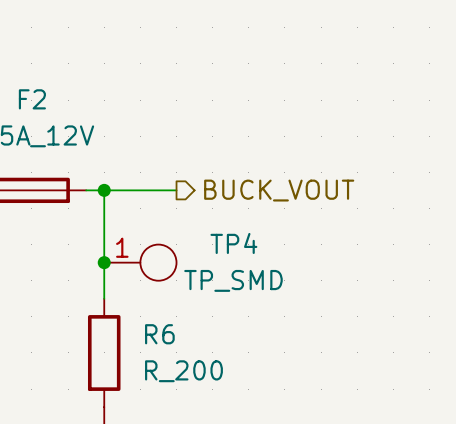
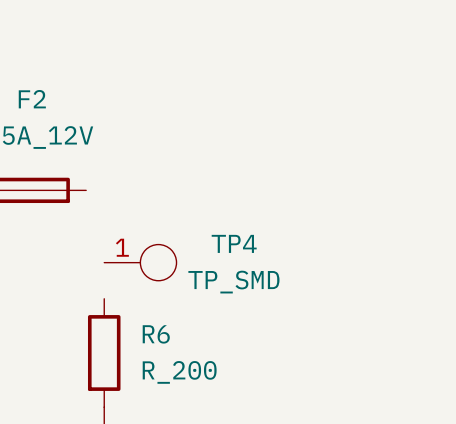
wire: (86, 190) (176, 190) -> none
wire: (104, 190) (104, 298) -> none
junction: (104, 190) -> none
hierarchical label: BUCK_VOUT (279, 190) -> none
junction: (104, 262) -> none

